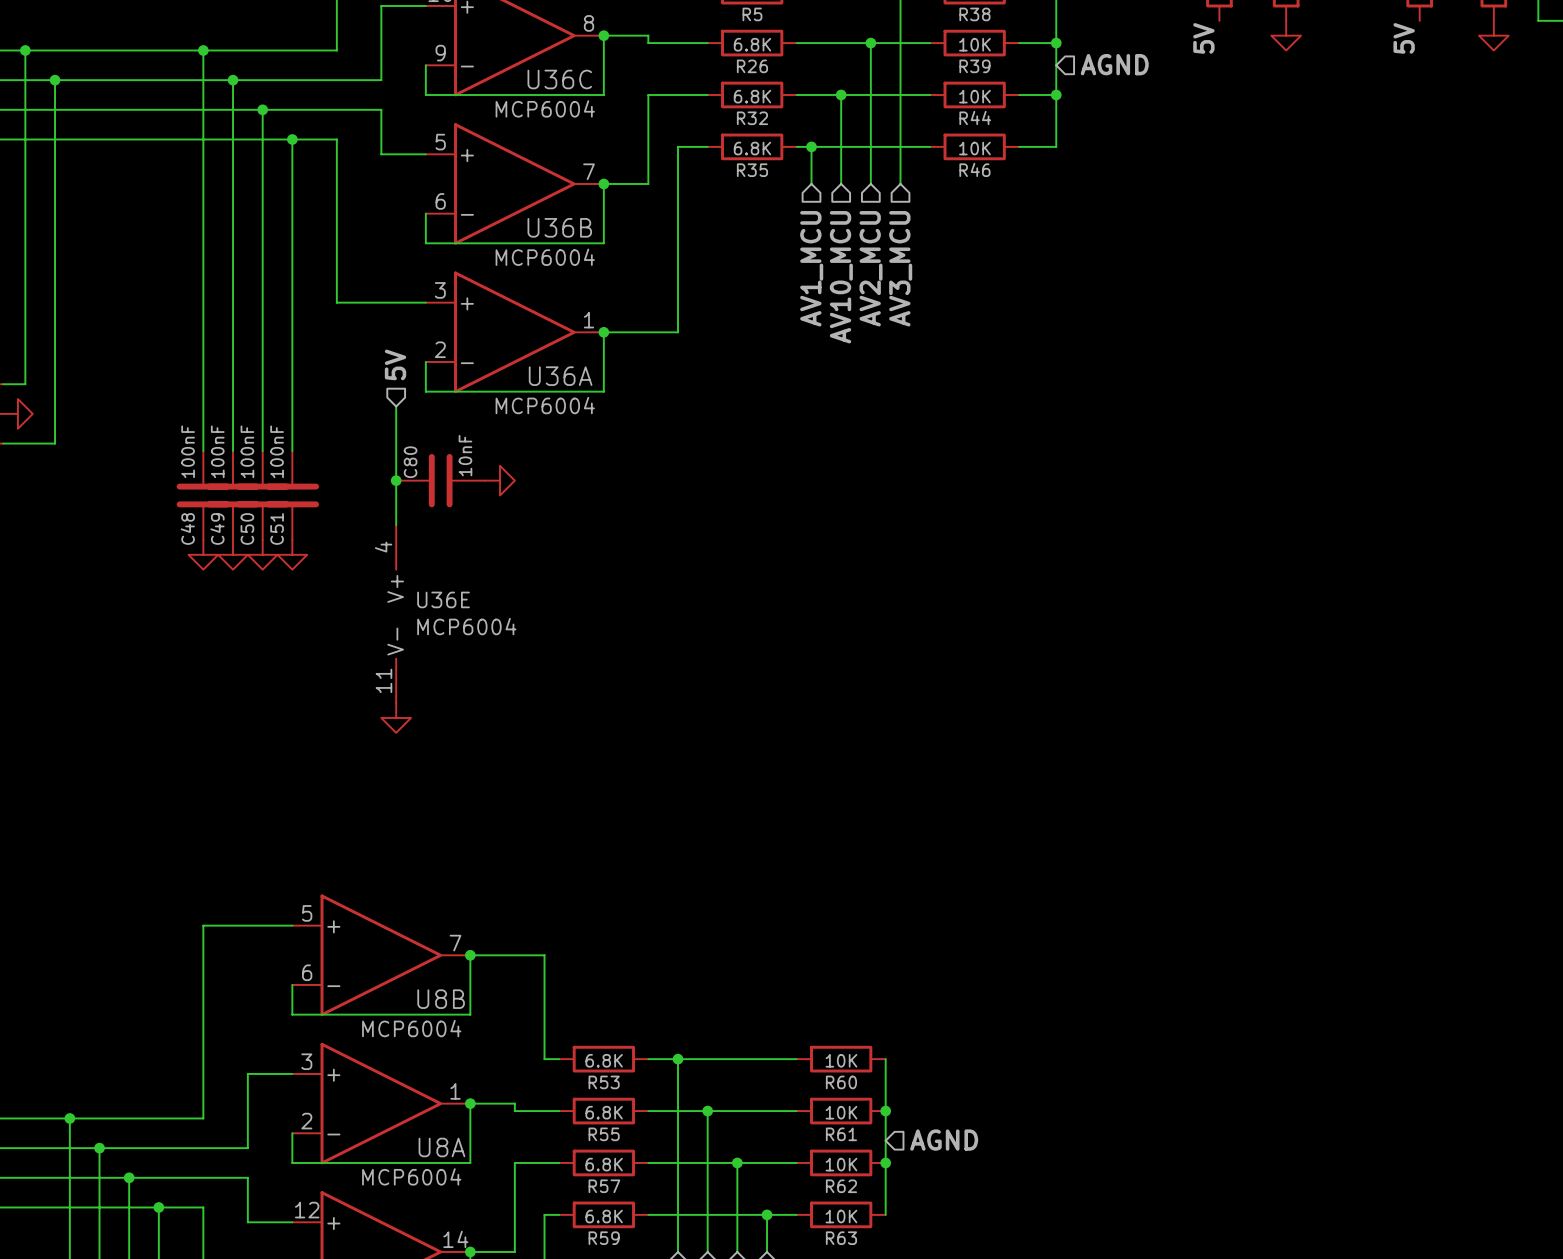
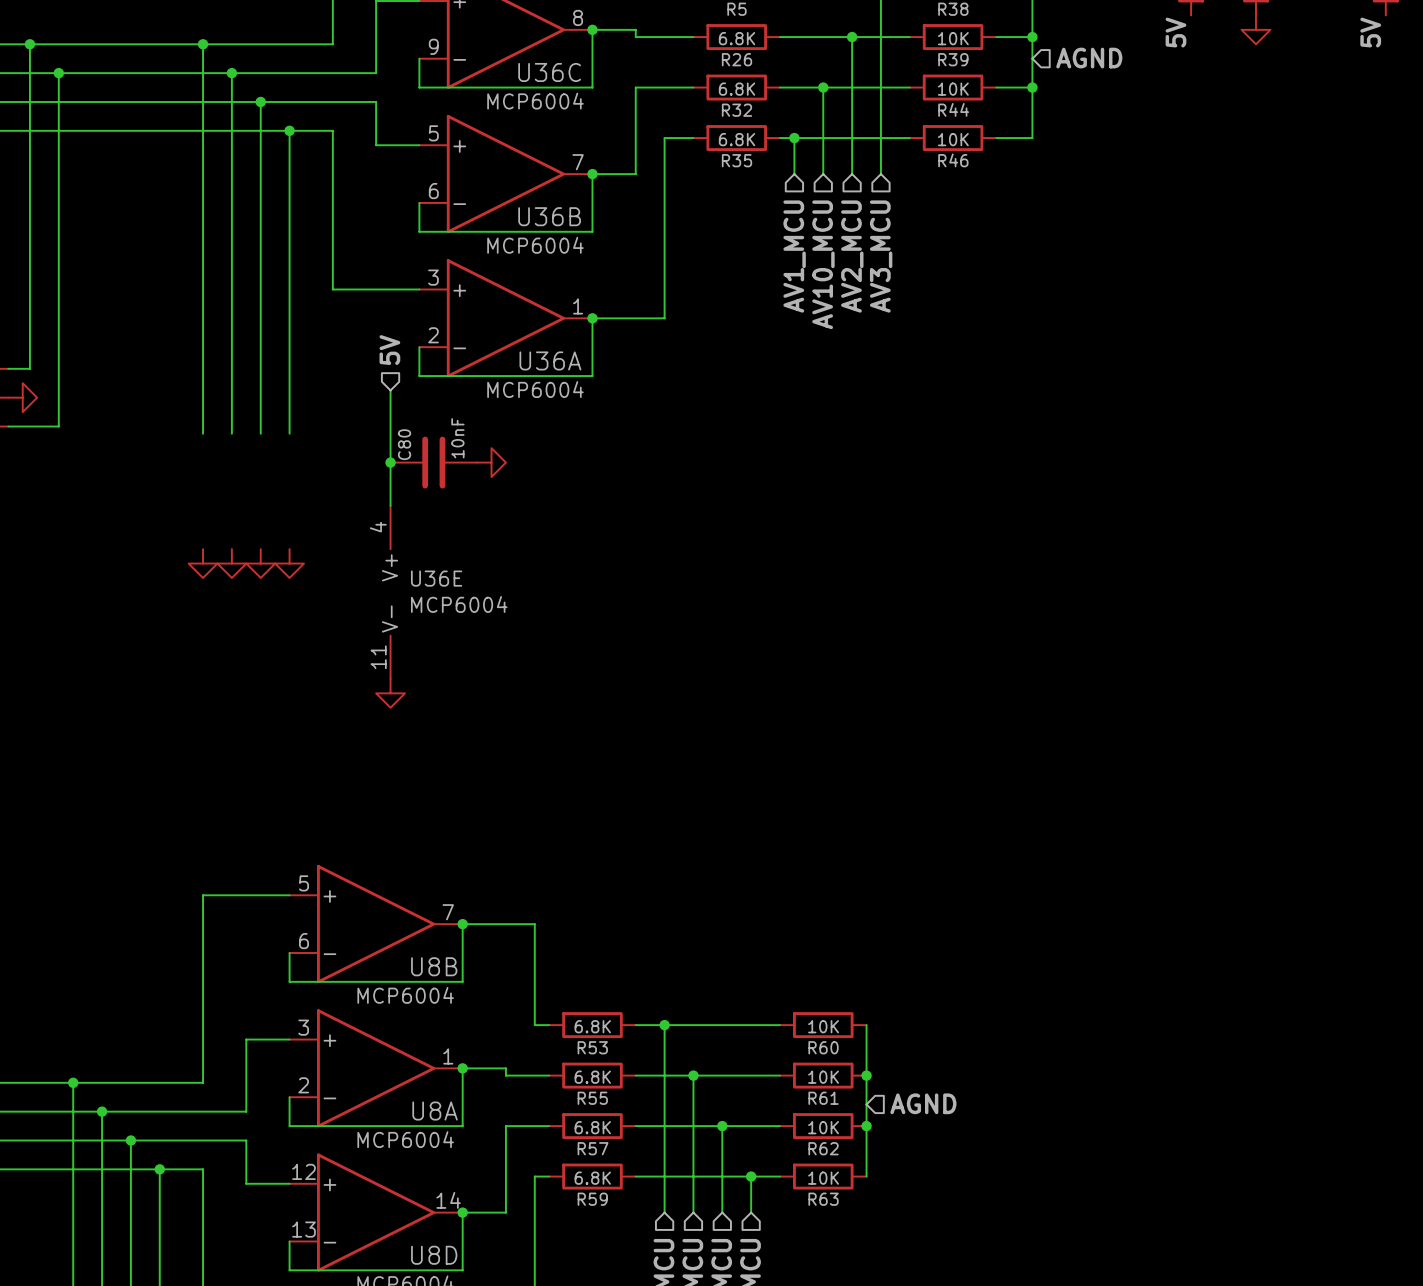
C48: 100nF (203, 495) -> none
C49: 100nF (233, 495) -> none
C50: 100nF (262, 495) -> none
C51: 100nF (292, 495) -> none
power symbol: (203, 554) -> none
power symbol: (233, 554) -> none
power symbol: (262, 554) -> none
power symbol: (292, 554) -> none
power symbol: none -> (203, 563)
power symbol: none -> (231, 563)
power symbol: none -> (260, 563)
power symbol: none -> (289, 563)

